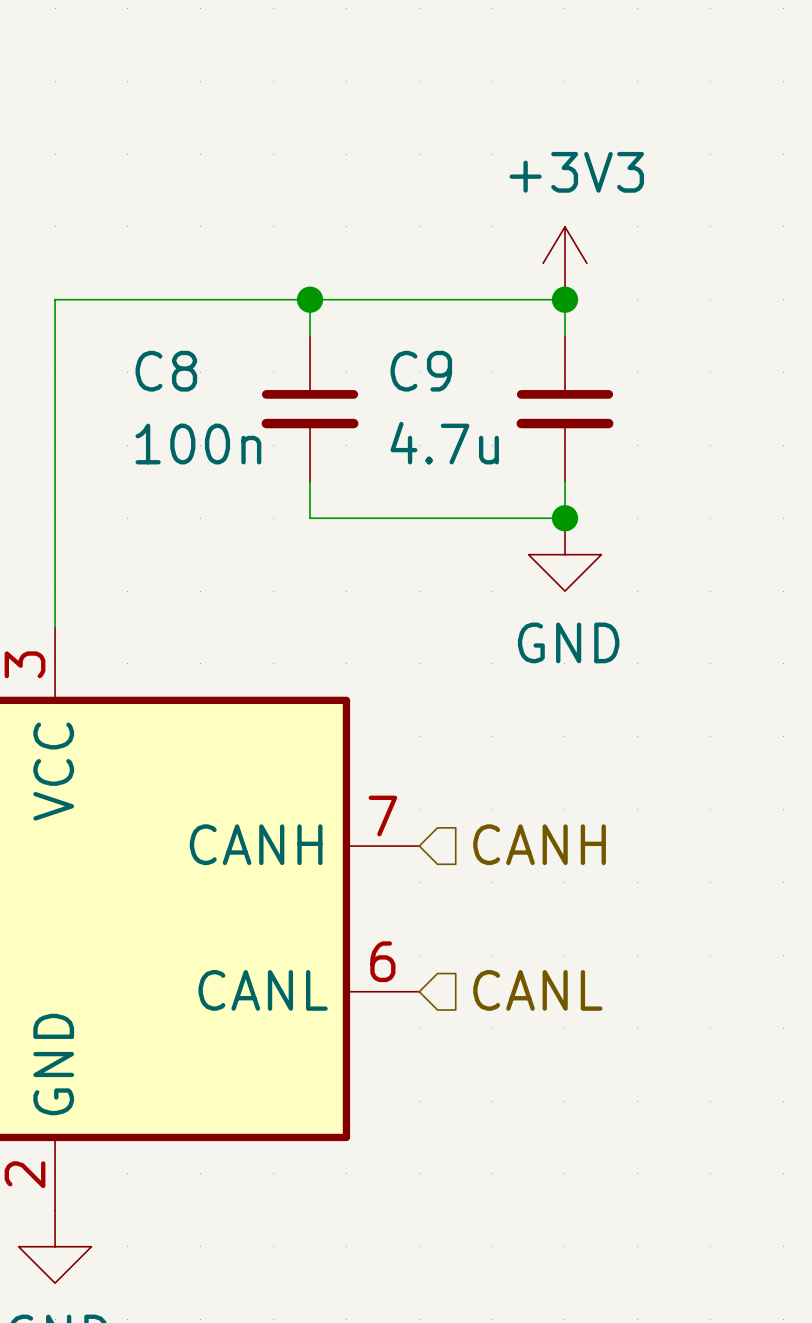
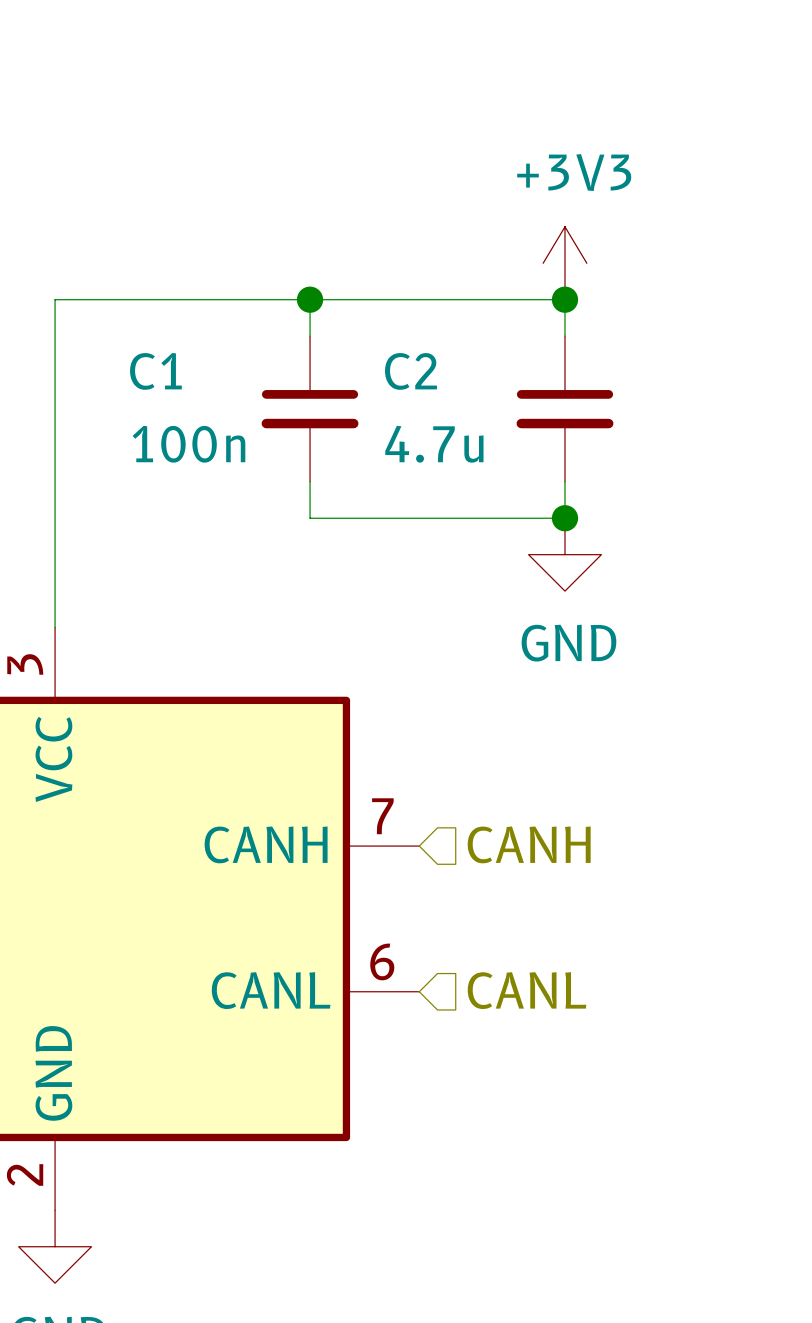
C8 name: C8 (166, 371) -> C1 (155, 371)
C9 name: C9 (421, 371) -> C2 (410, 371)

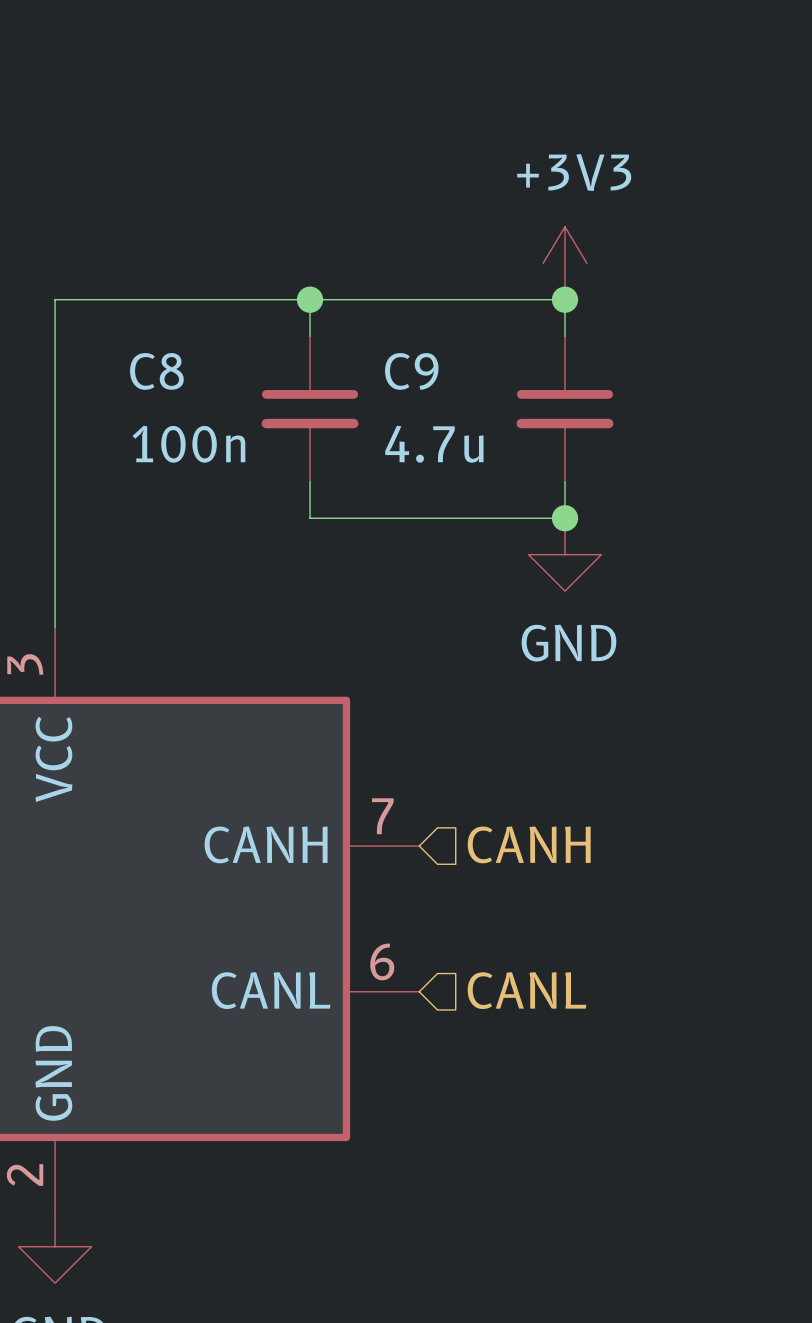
C1 name: C1 (155, 371) -> C8 (156, 371)
C2 name: C2 (410, 371) -> C9 (411, 371)

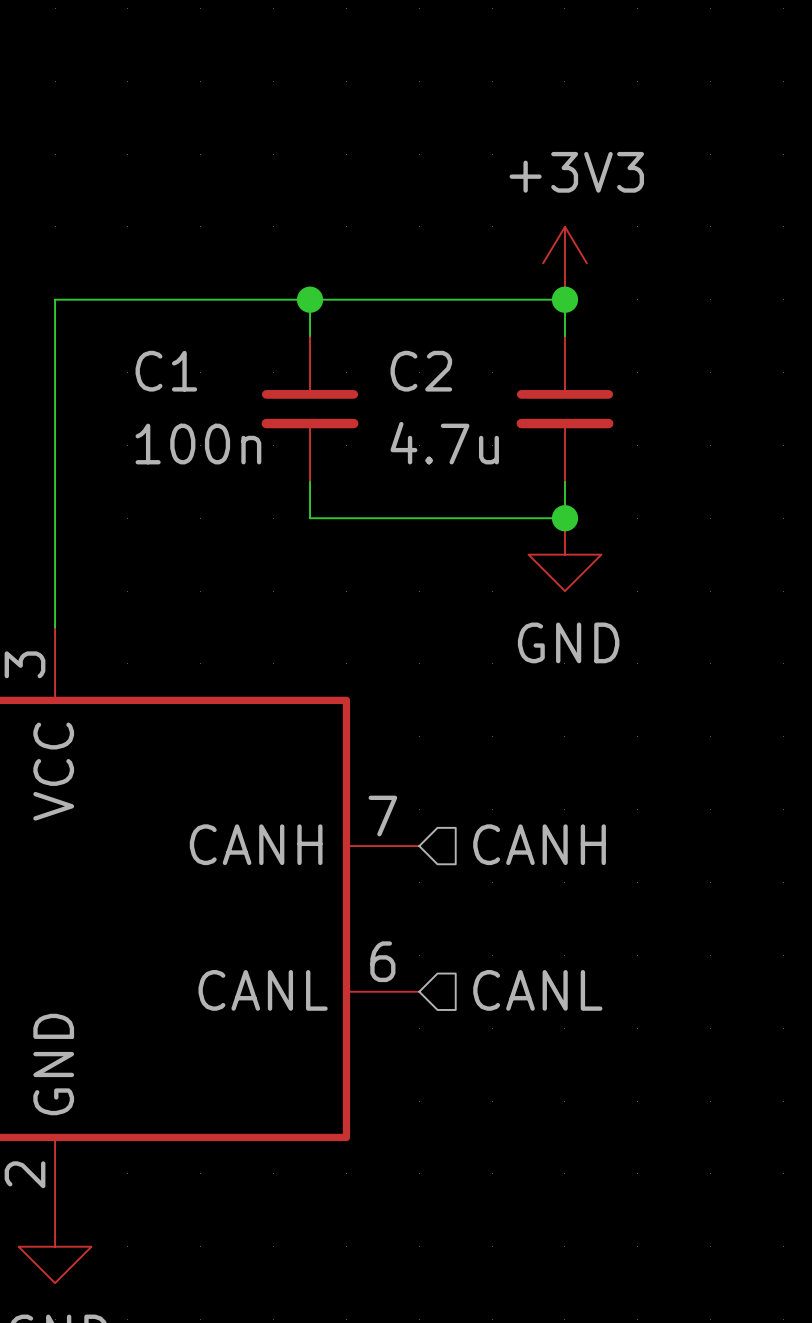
C8 name: C8 (156, 371) -> C1 (166, 371)
C9 name: C9 (411, 371) -> C2 (421, 371)

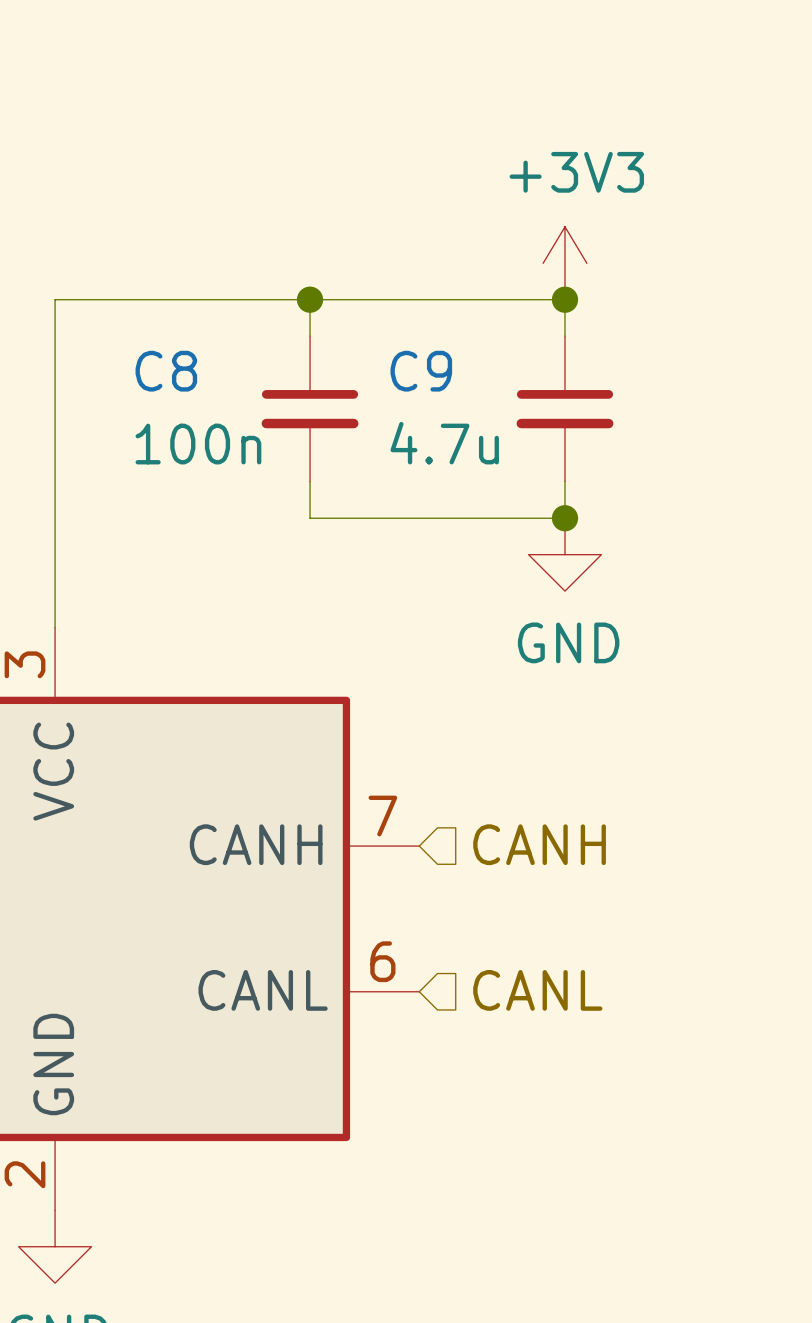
C1 name: C1 (166, 371) -> C8 (166, 371)
C2 name: C2 (421, 371) -> C9 (421, 371)

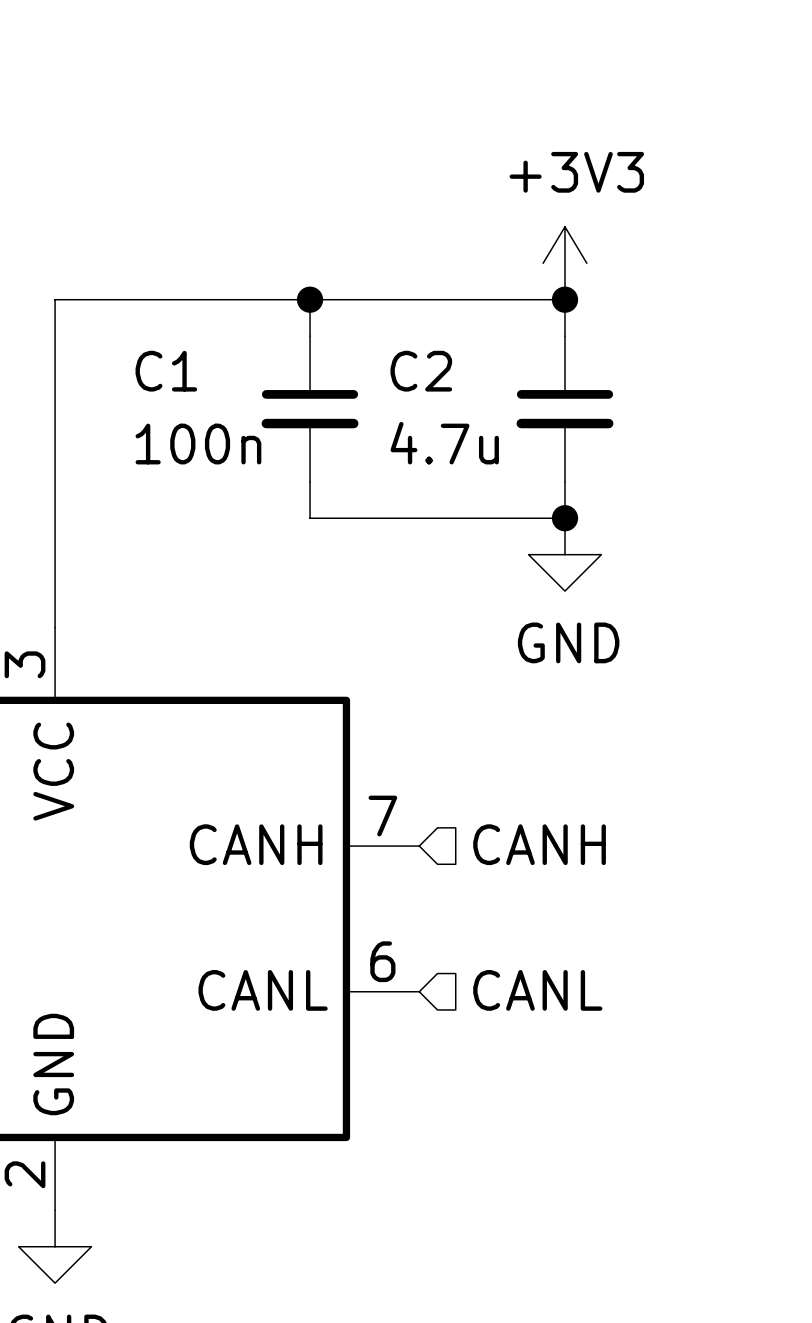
C8 name: C8 (166, 371) -> C1 (166, 371)
C9 name: C9 (421, 371) -> C2 (421, 371)

